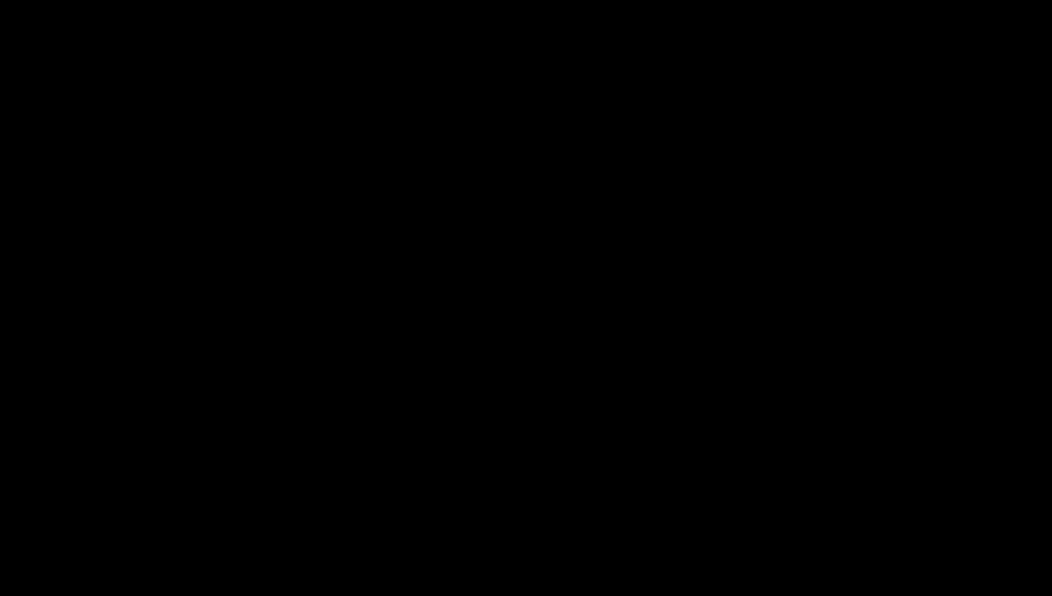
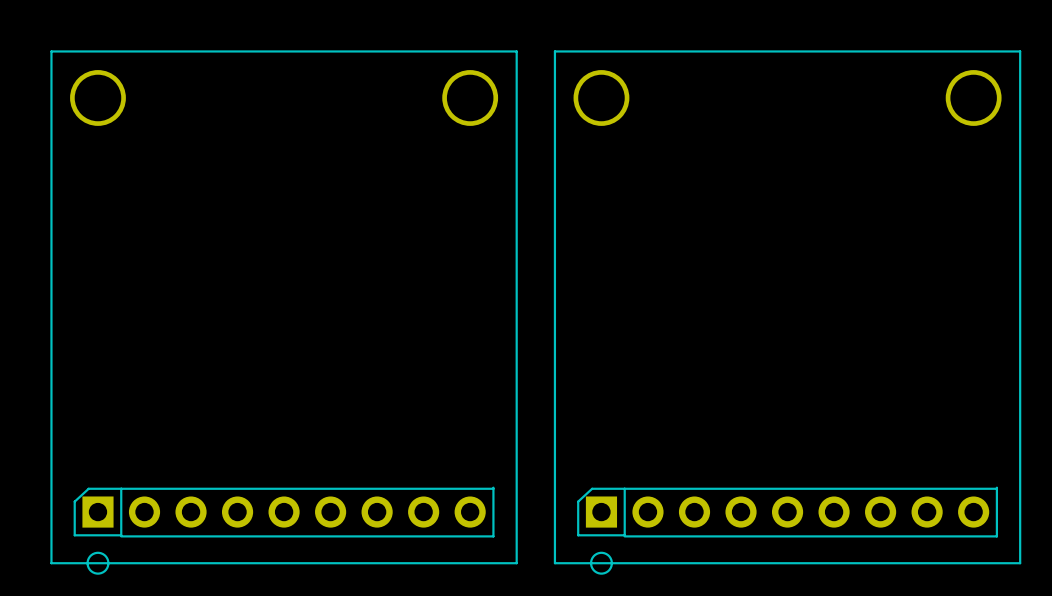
part: none -> (284, 312)
part: none -> (787, 312)

